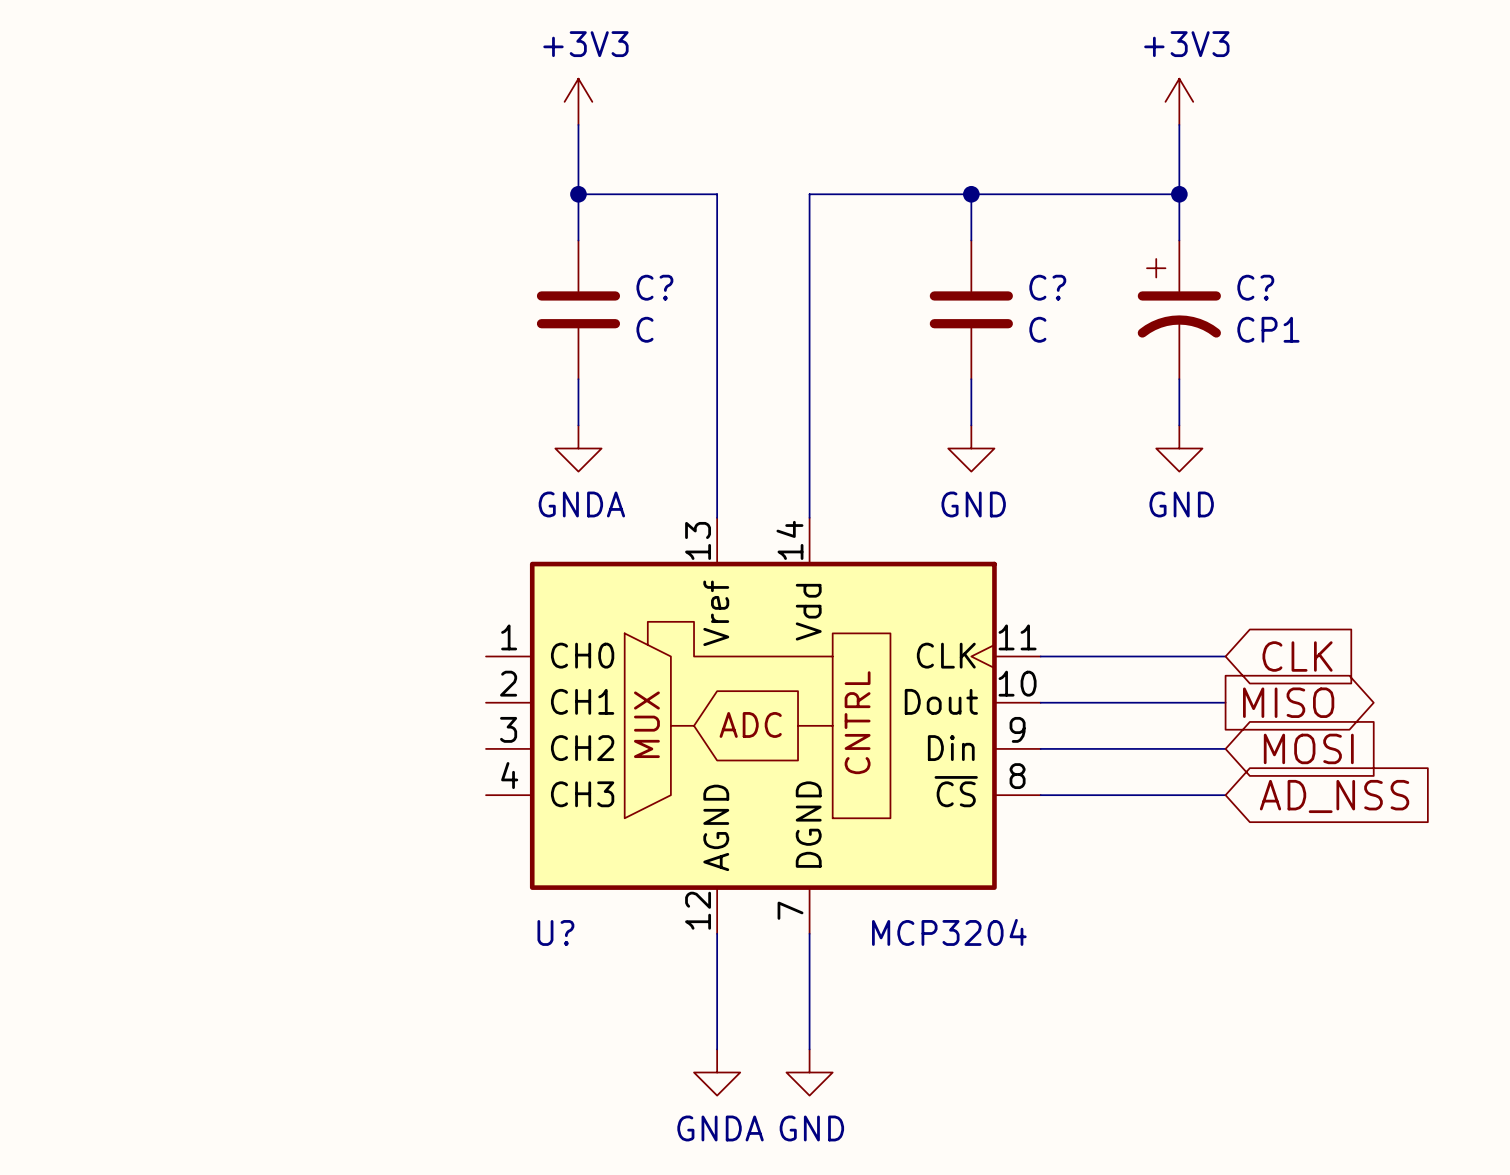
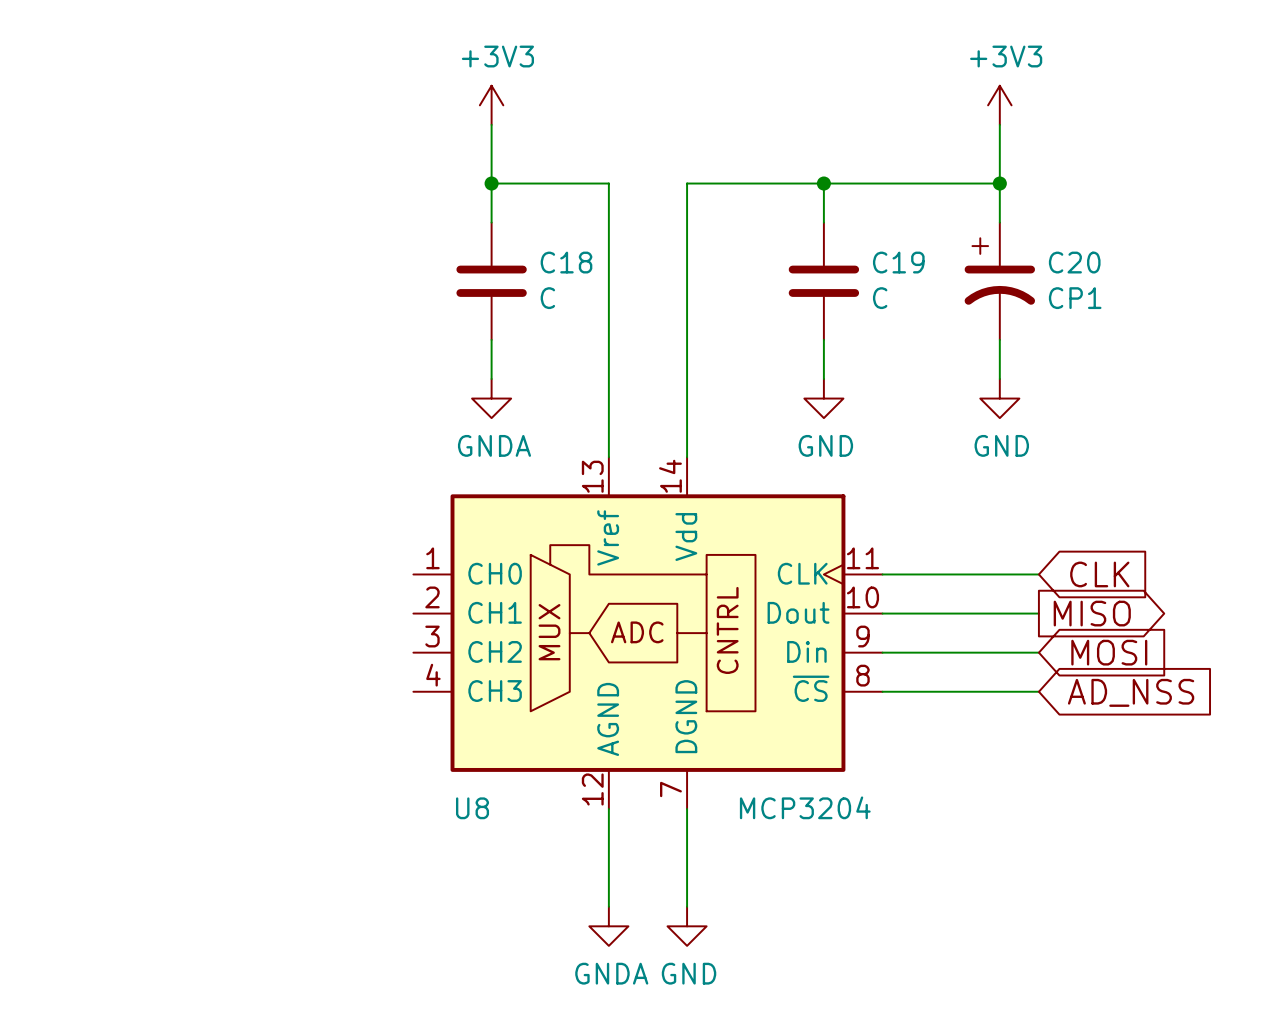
C? name: C? (654, 287) -> C18 (566, 262)
C? name: C? (1047, 287) -> C19 (898, 262)
C? name: C? (1255, 287) -> C20 (1074, 262)
U? name: U? (555, 932) -> U8 (472, 808)

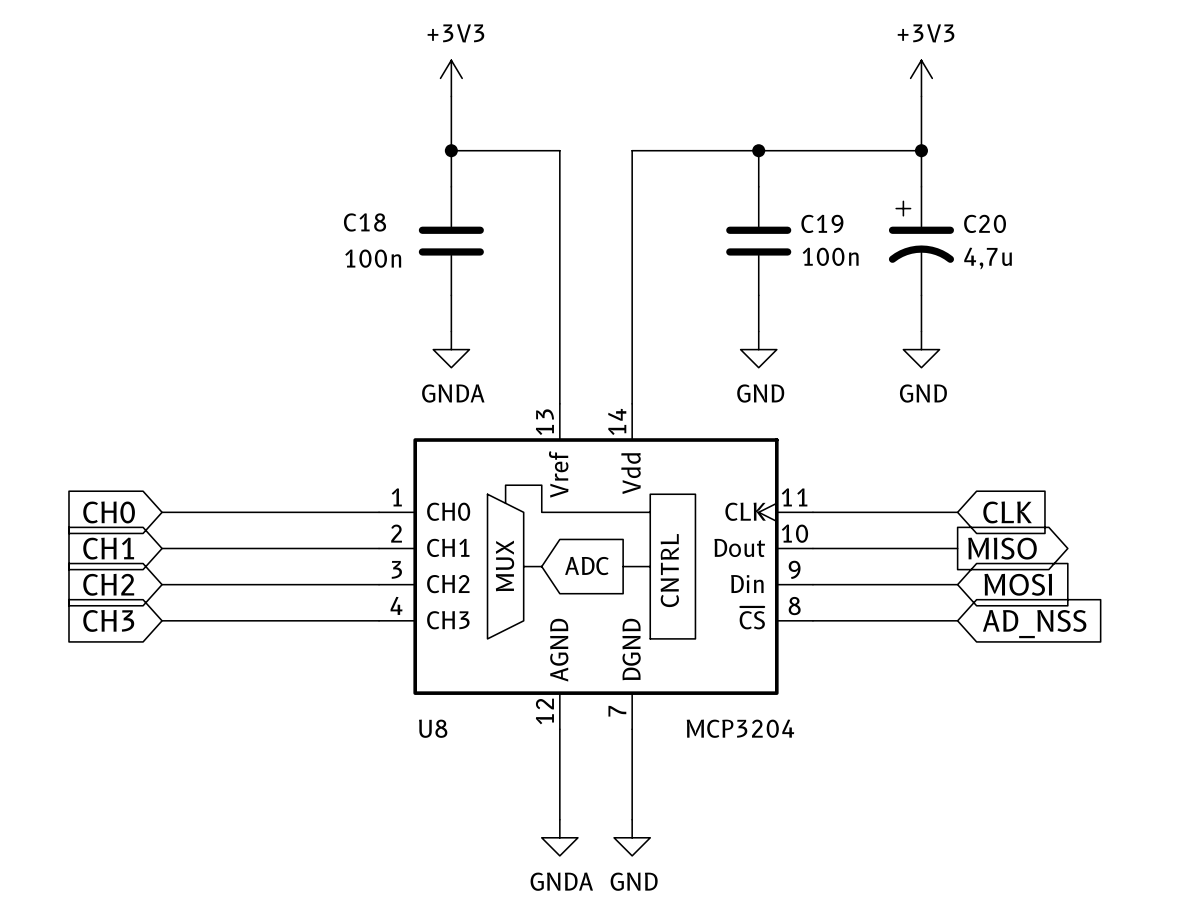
C18 name position: C18 (566, 262) -> C18 (365, 222)
C18 value: C (547, 298) -> 100n (373, 258)
C19 value: C (880, 298) -> 100n (830, 256)
C20 value: CP1 (1075, 298) -> 4,7u (988, 258)
global label: none -> CH0 (109, 512)
wire: none -> (162, 512) (379, 512)
global label: none -> CH1 (108, 548)
wire: none -> (162, 548) (379, 548)
global label: none -> CH2 (108, 584)
wire: none -> (162, 584) (379, 584)
global label: none -> CH3 (108, 620)
wire: none -> (162, 620) (379, 620)

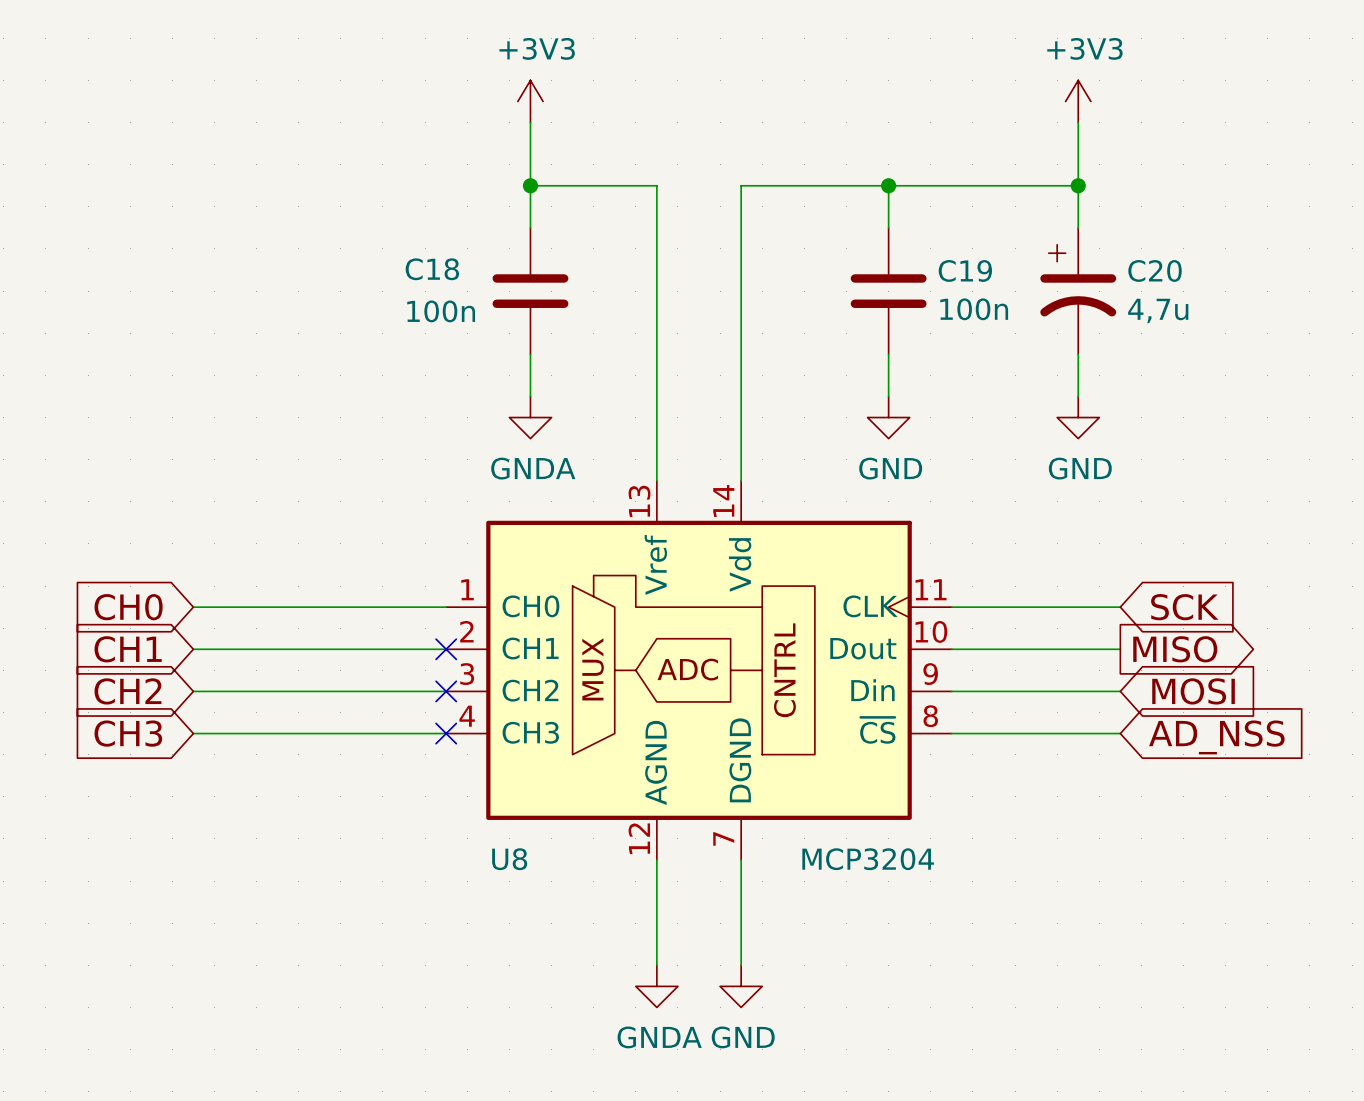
global label: CLK (1007, 512) -> SCK (1184, 607)
no-connect mark: none -> (446, 649)
no-connect mark: none -> (446, 691)
no-connect mark: none -> (446, 733)

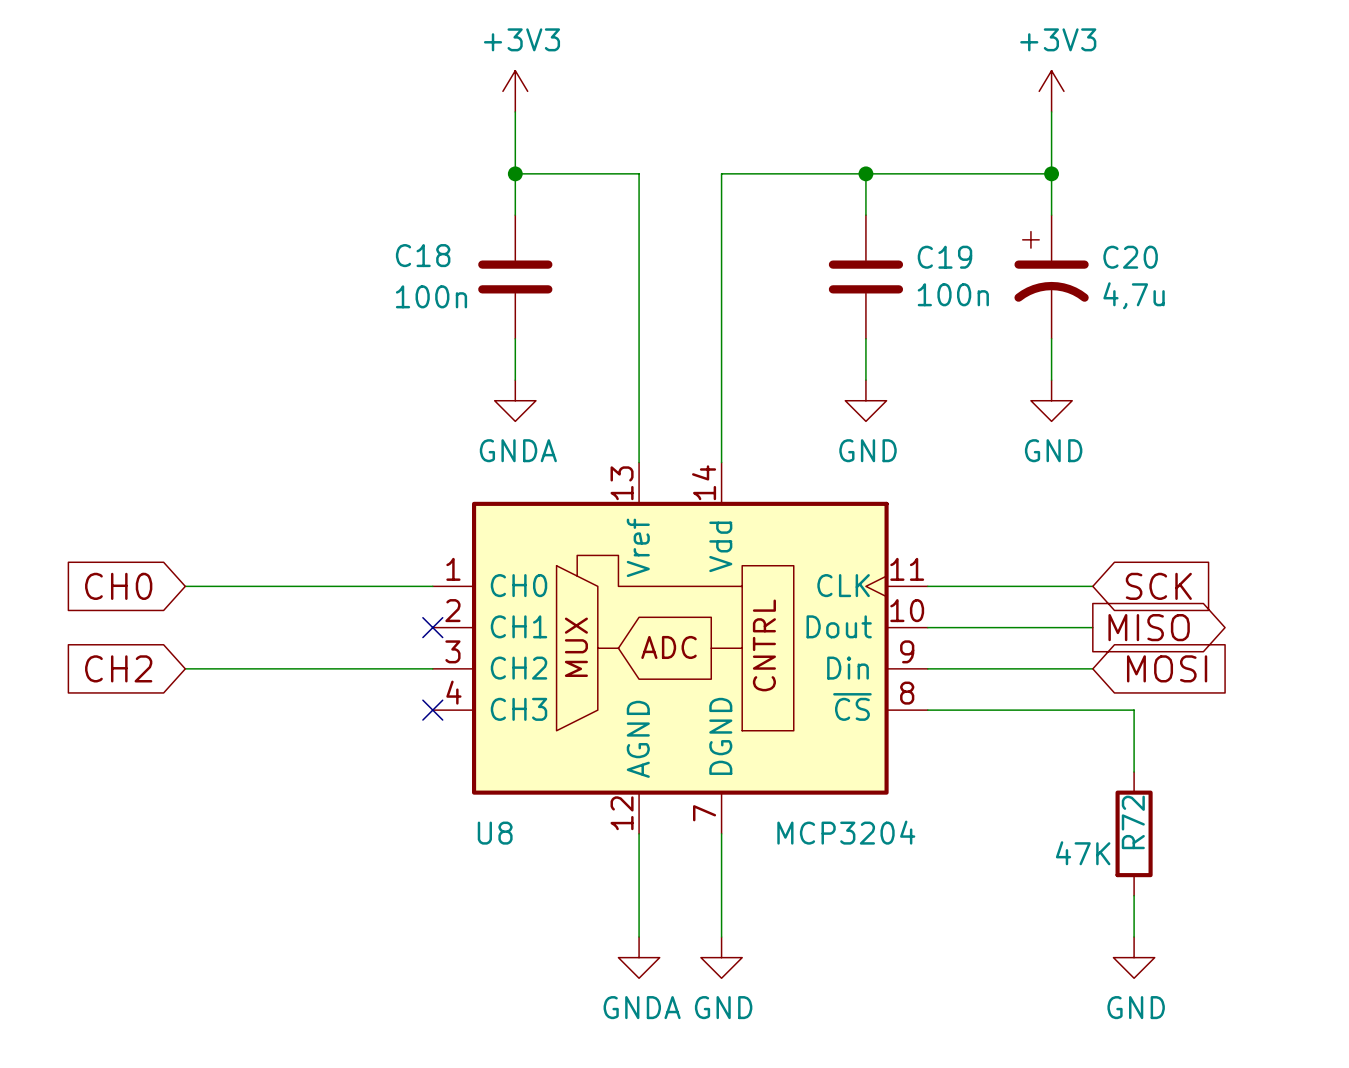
global label: CH1 (128, 649) -> none
wire: (193, 649) (446, 649) -> none
no-connect mark: (446, 691) -> none
global label: CH3 (128, 733) -> none
wire: (193, 733) (446, 733) -> none
wire: none -> (1092, 710) (1134, 710) (1134, 772)
global label: AD_NSS (1216, 737) -> none
R72: none -> 47K (1134, 833)
wire: none -> (1134, 895) (1134, 937)
power symbol: none -> GND (1134, 957)

